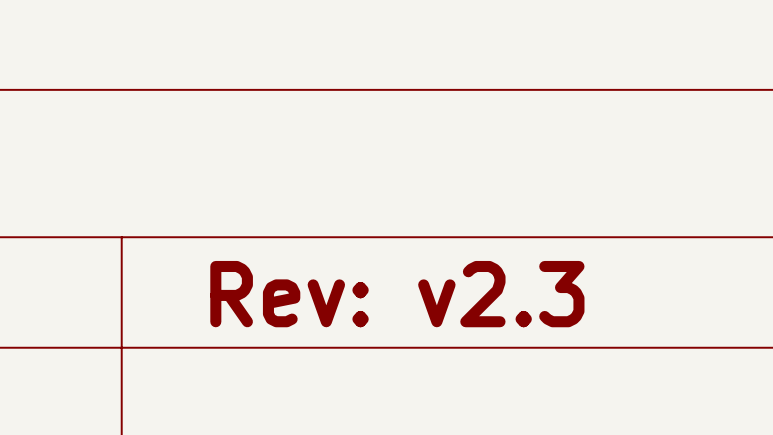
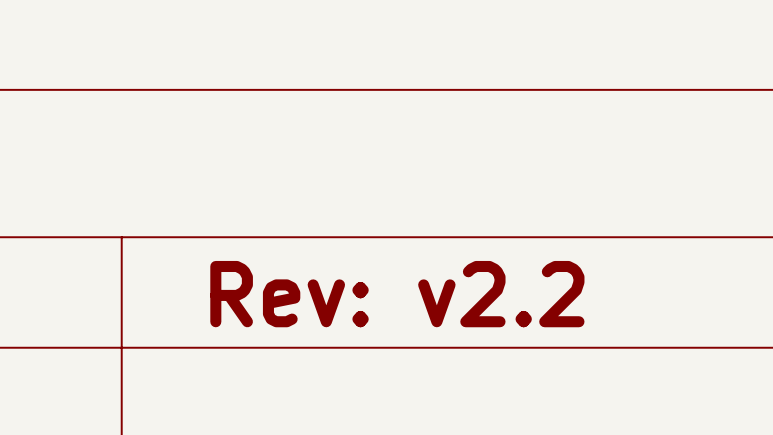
title block: Rev: v2.3 (397, 294) -> Rev: v2.2 (397, 294)

